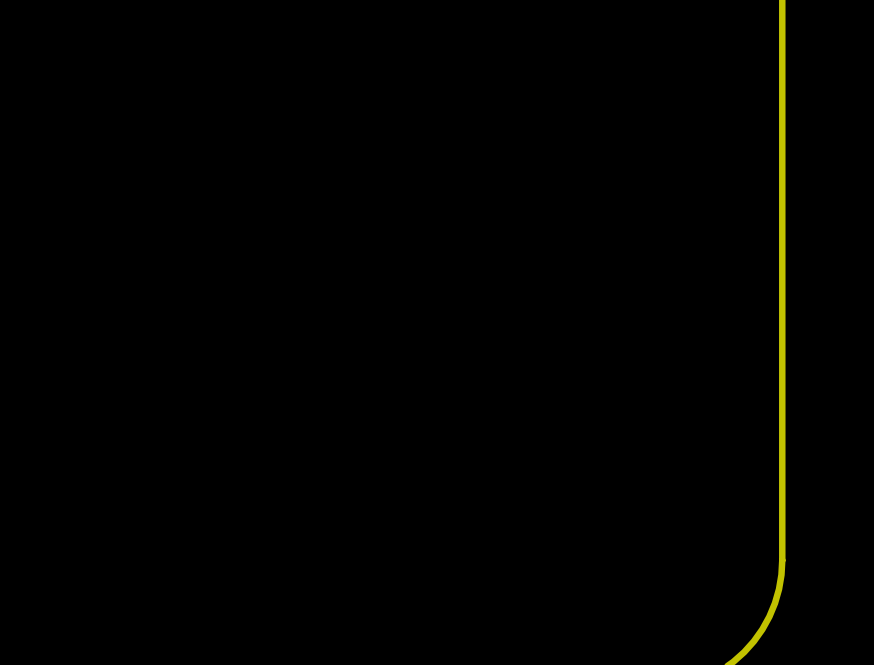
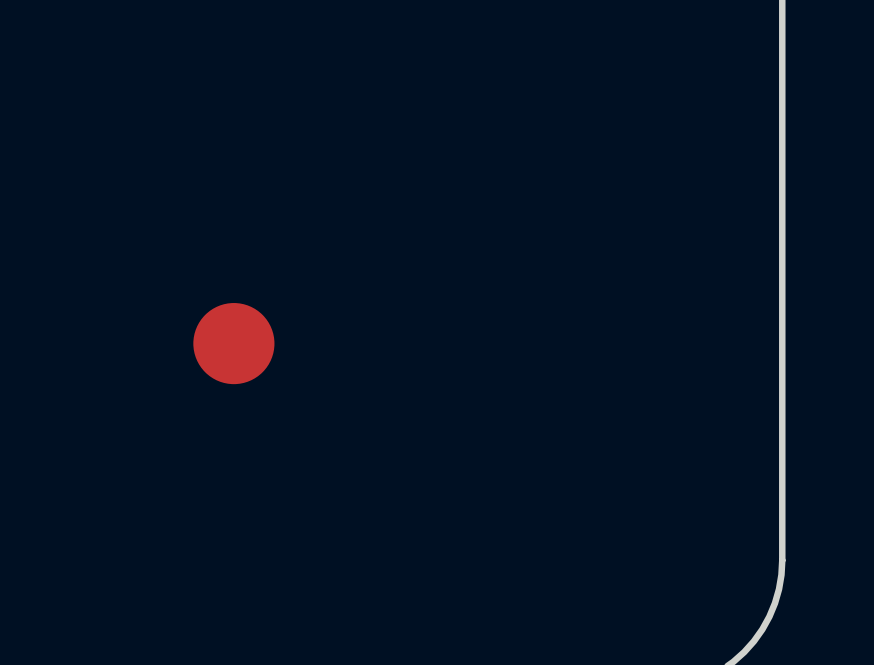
part: none -> (233, 343)

